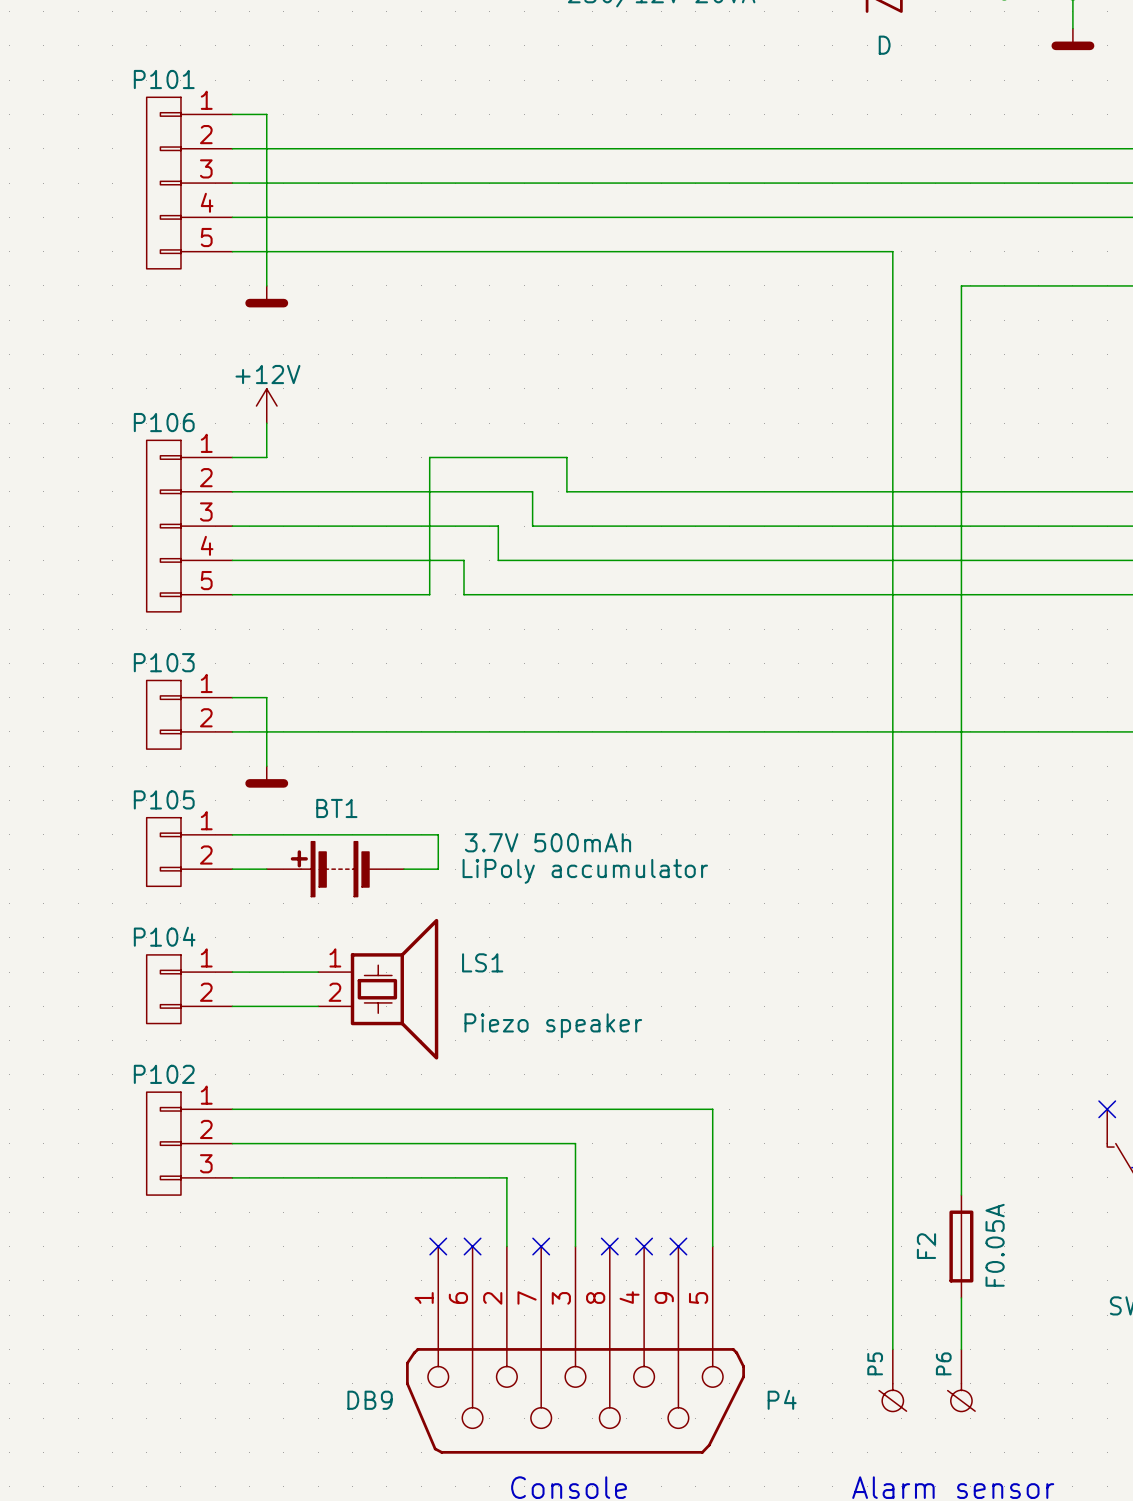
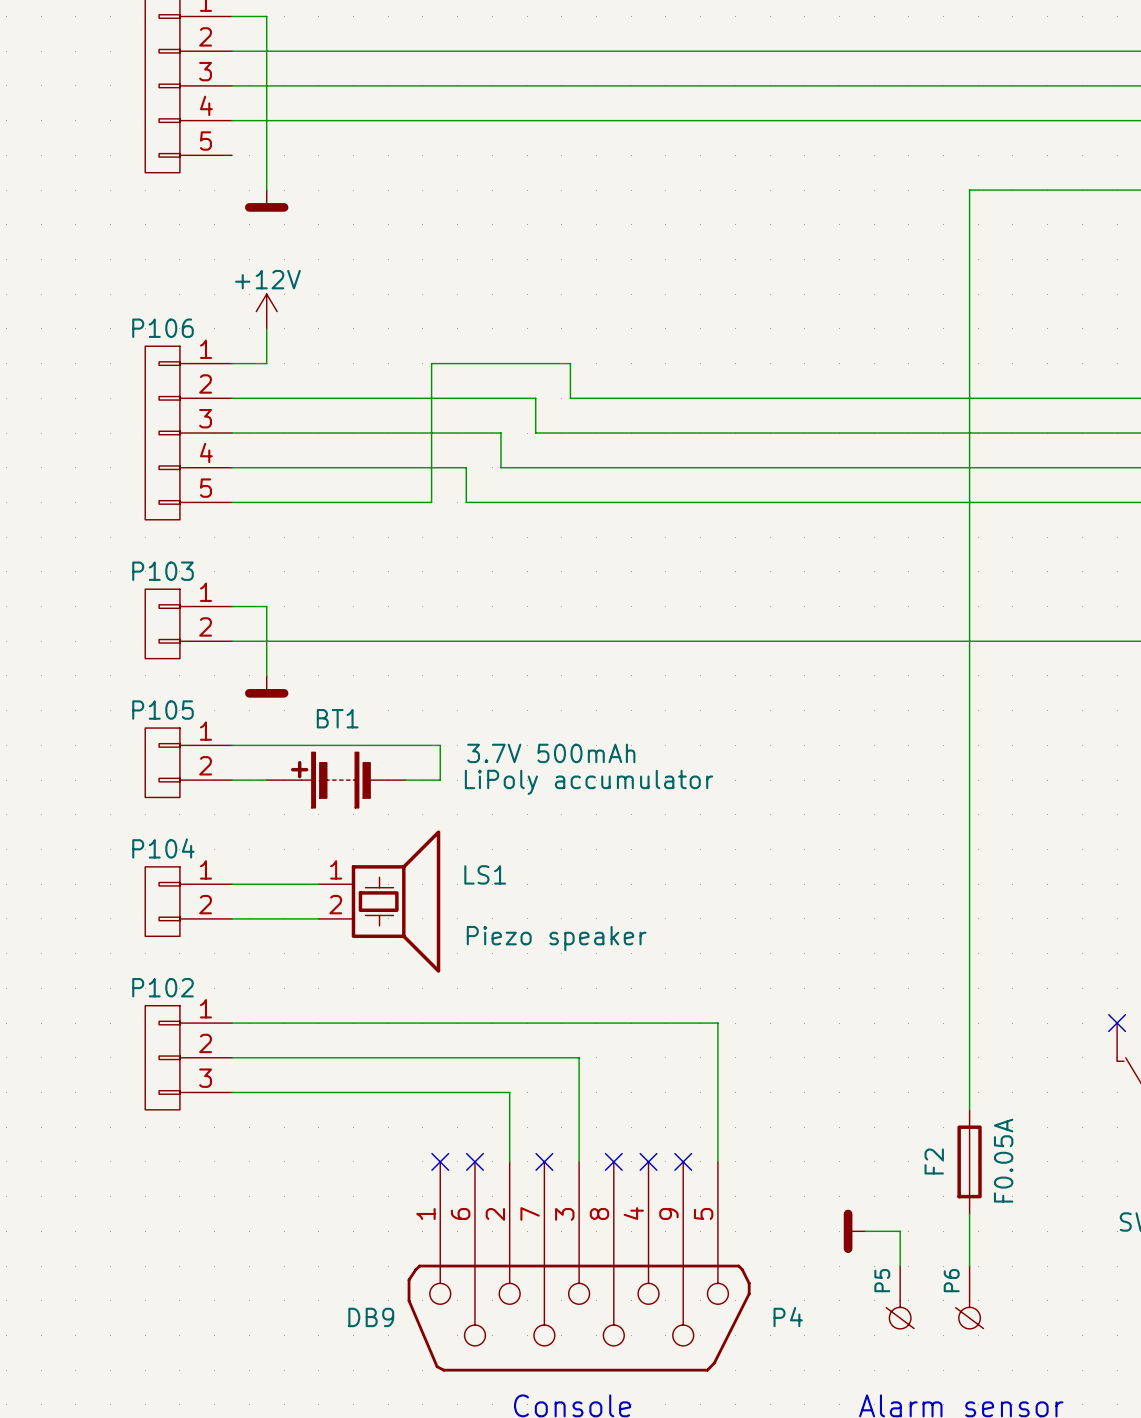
wire: (232, 251) (892, 251) (892, 1349) -> (865, 1231) (900, 1231) (900, 1266)
power symbol: none -> (854, 1231)

